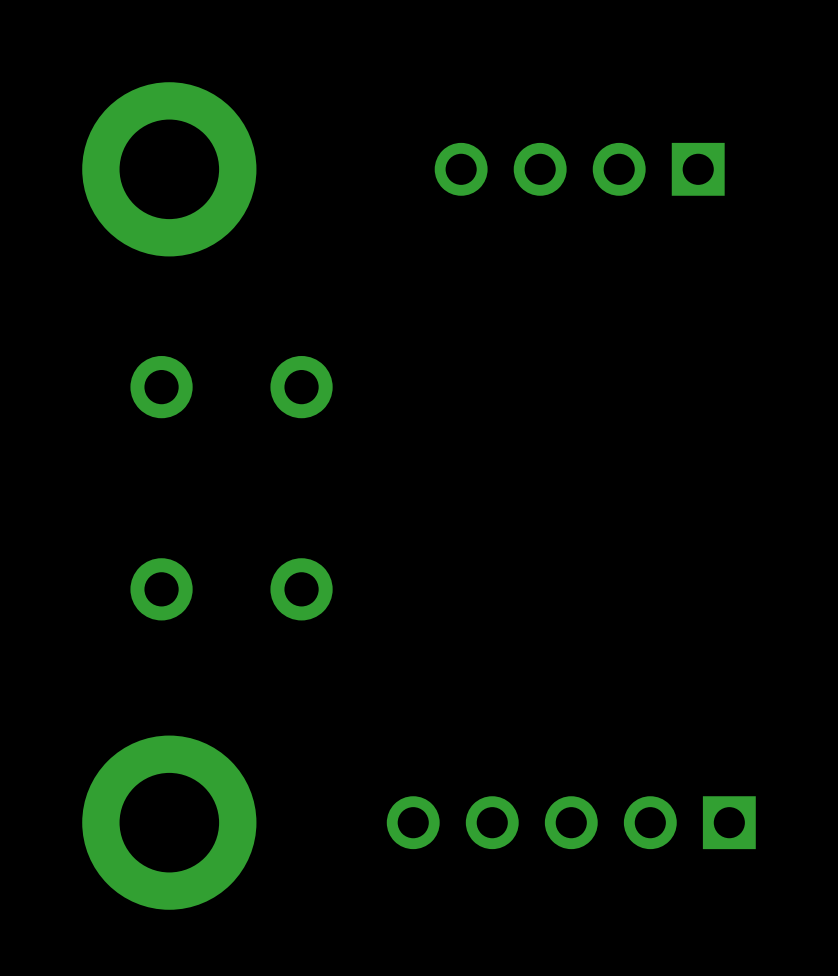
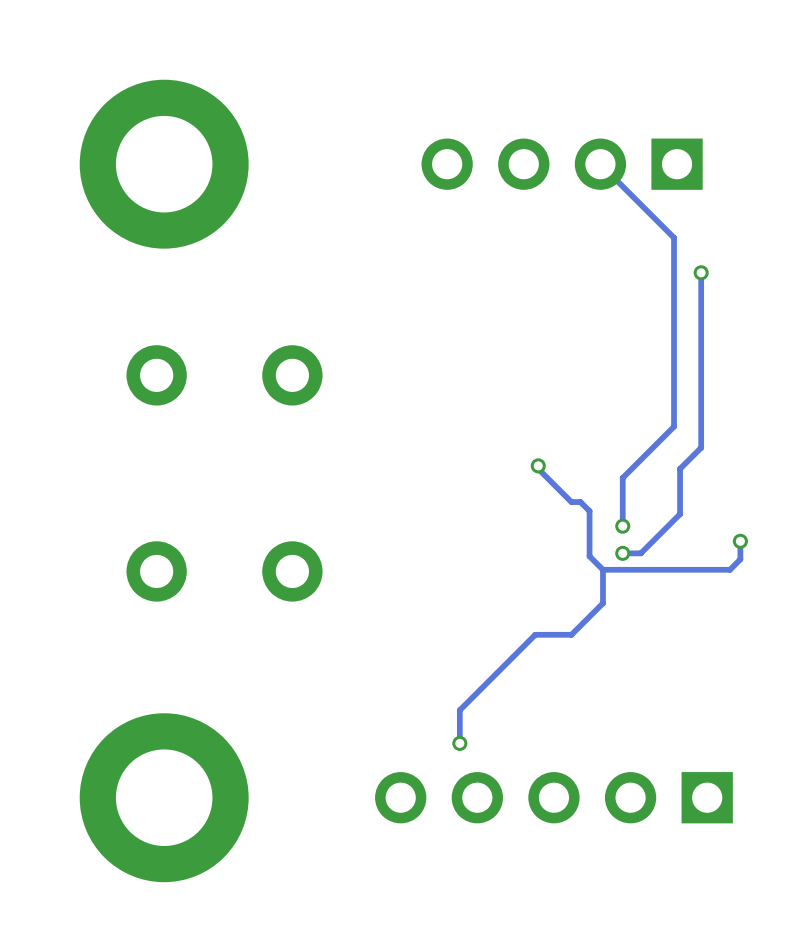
track: none -> (600, 164) (674, 237) (674, 426) (622, 477) (622, 526)
track: none -> (701, 272) (701, 447) (680, 468) (680, 514) (640, 553) (622, 553)
via: none -> (701, 272)
track: none -> (538, 465) (538, 468) (571, 502) (580, 502) (589, 511) (589, 556) (602, 569)
via: none -> (538, 465)
via: none -> (622, 526)
track: none -> (740, 541) (740, 559) (729, 569) (602, 569)
via: none -> (740, 541)
via: none -> (622, 553)
track: none -> (602, 569) (602, 603) (571, 634) (535, 634) (459, 710) (459, 743)
via: none -> (459, 743)

